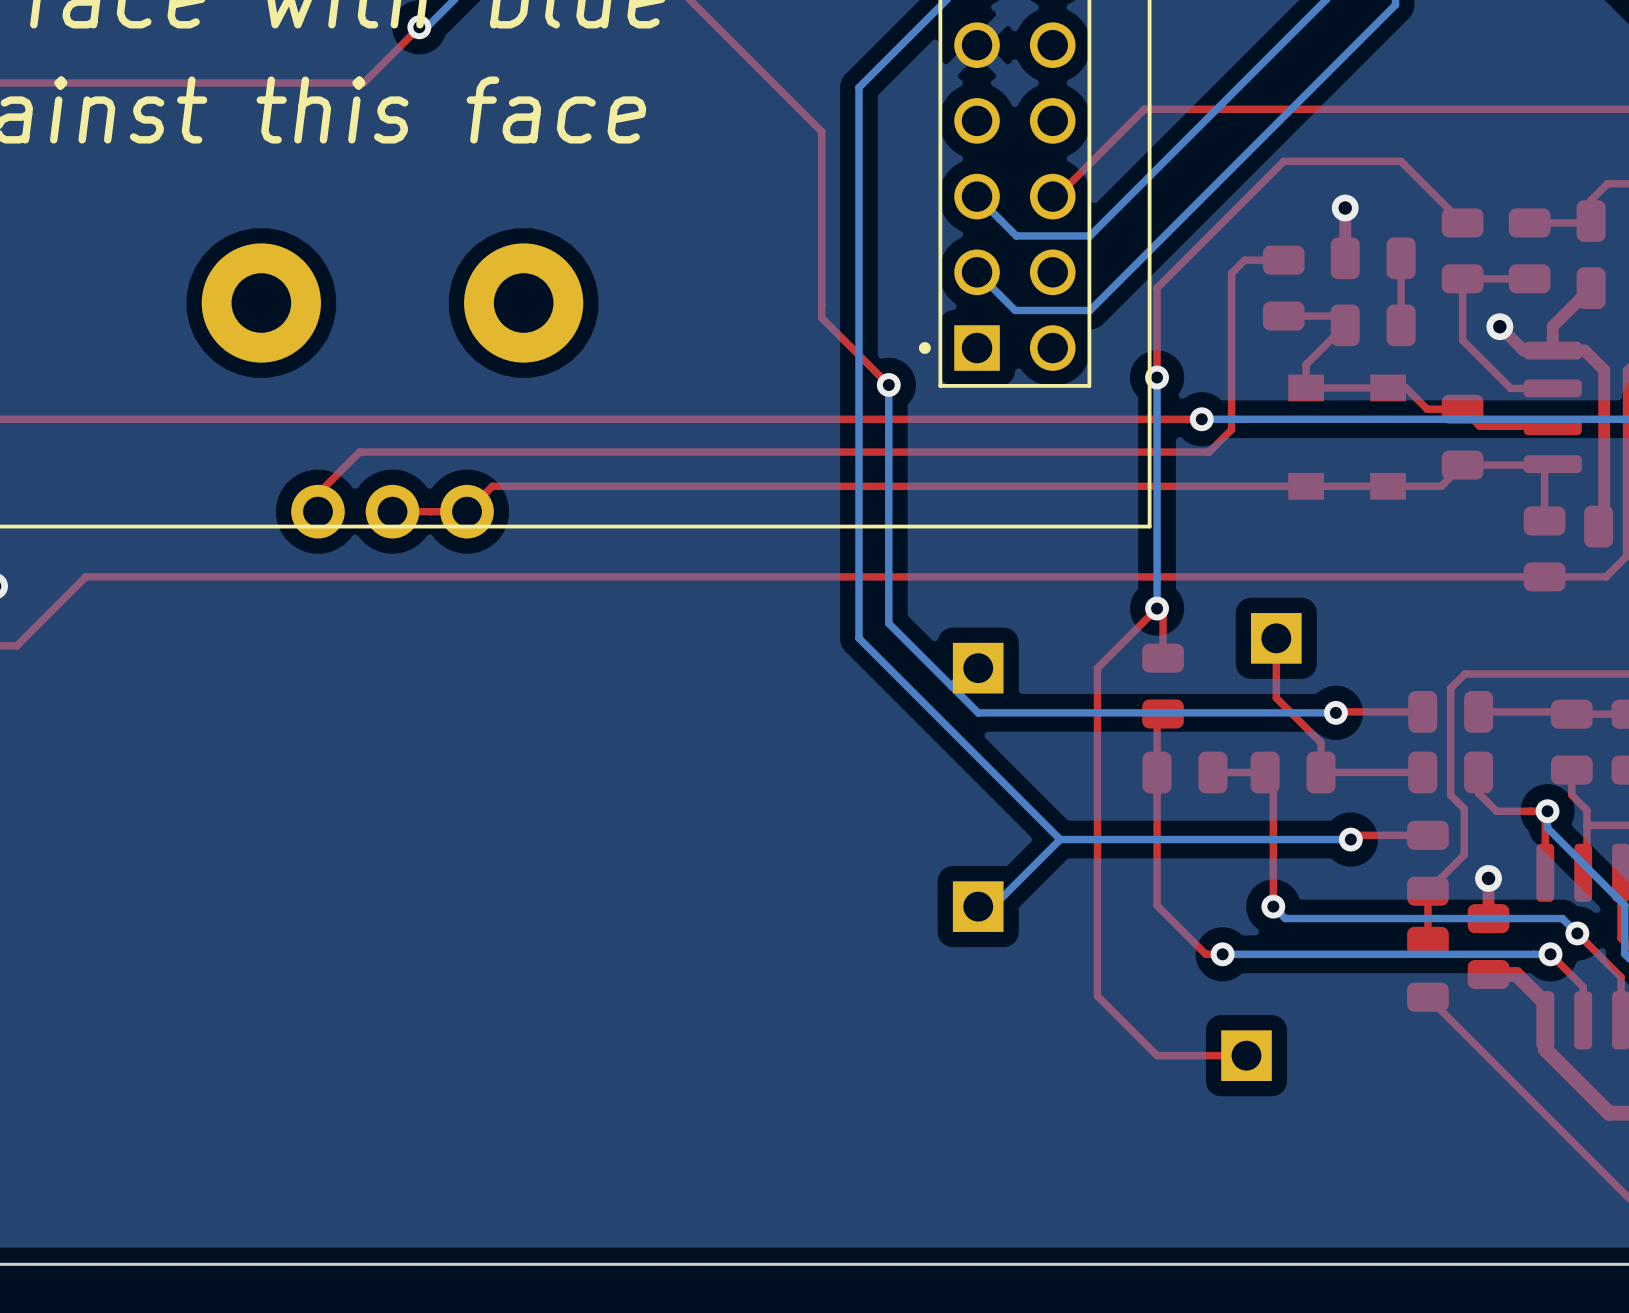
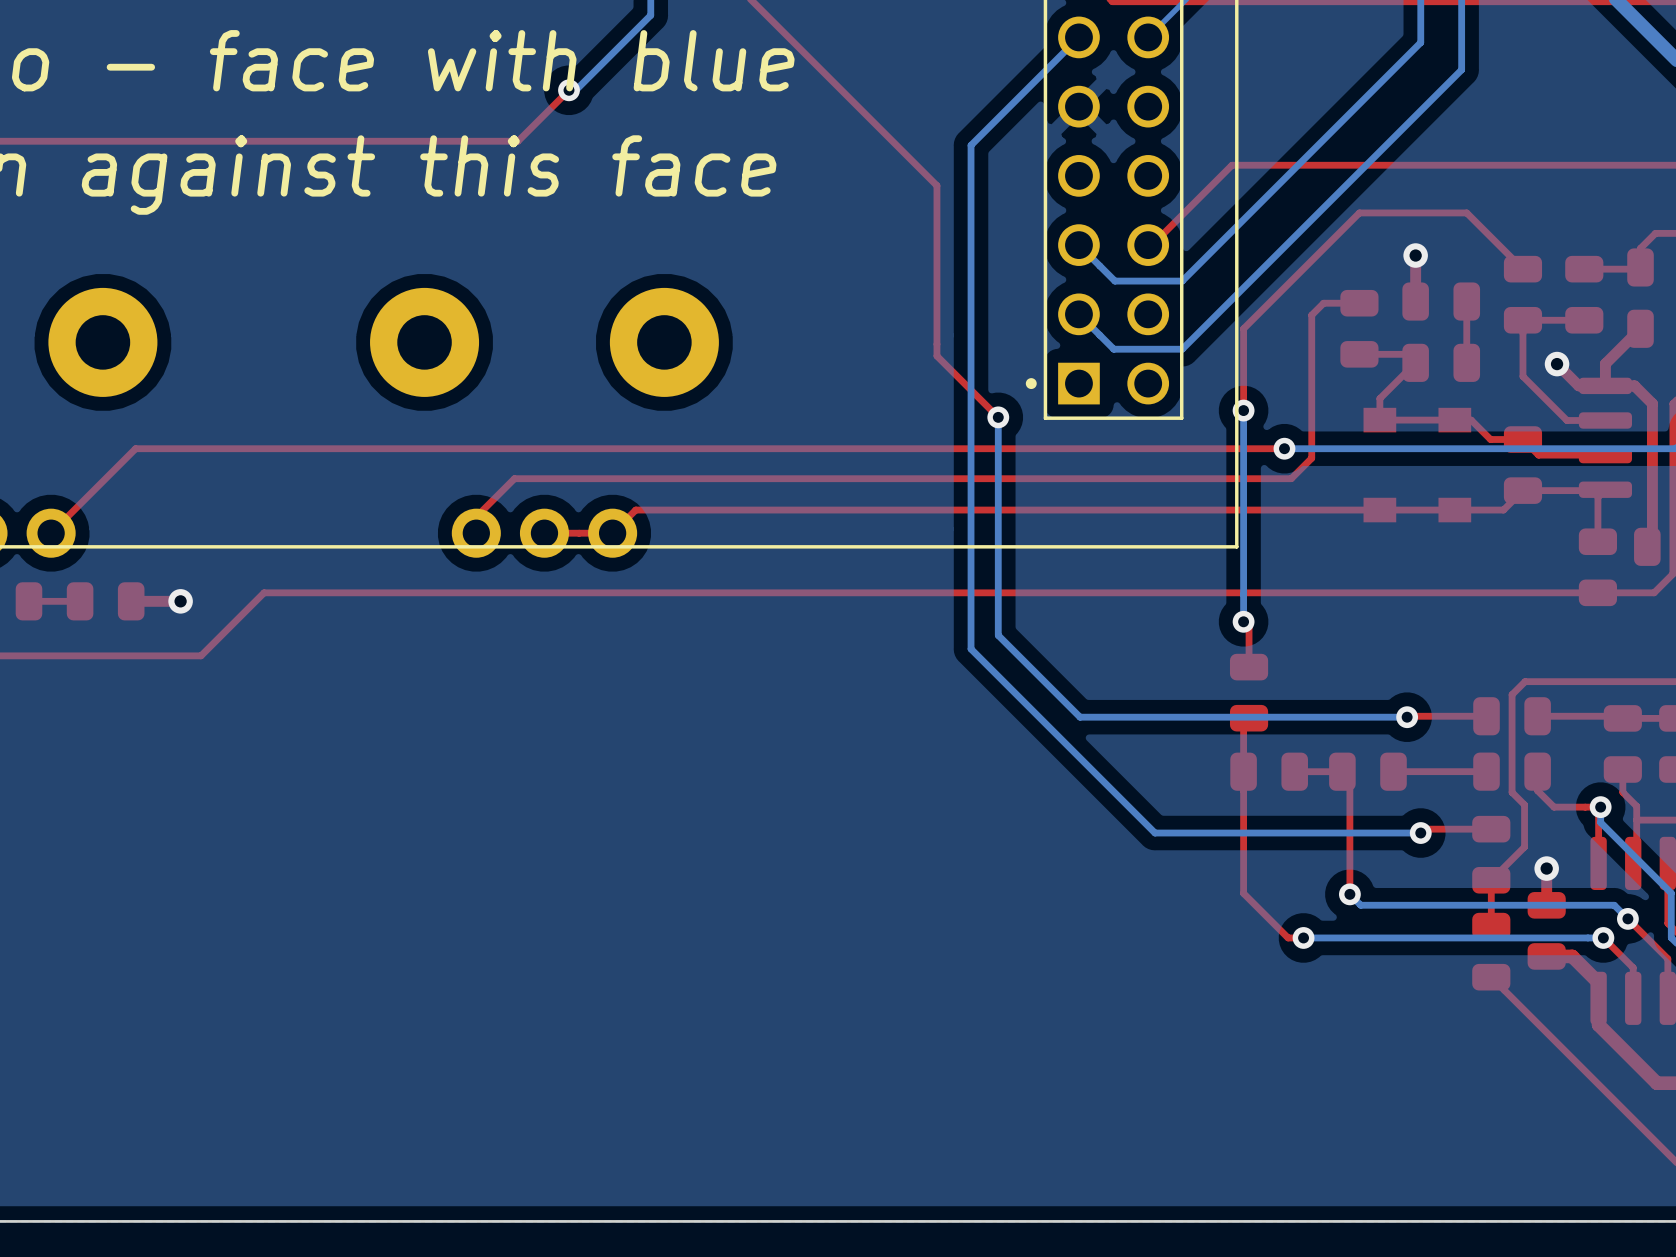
top track: (1157, 608) (1097, 668) (1097, 996) (1157, 1055) (1246, 1055) -> none
top track: (1276, 638) (1276, 697) (1321, 742) (1321, 772) -> none
part: (1276, 638) -> none
part: (978, 668) -> none
bottom track: (1060, 839) (993, 906) (978, 906) -> none
part: (978, 906) -> none
part: (1246, 1055) -> none

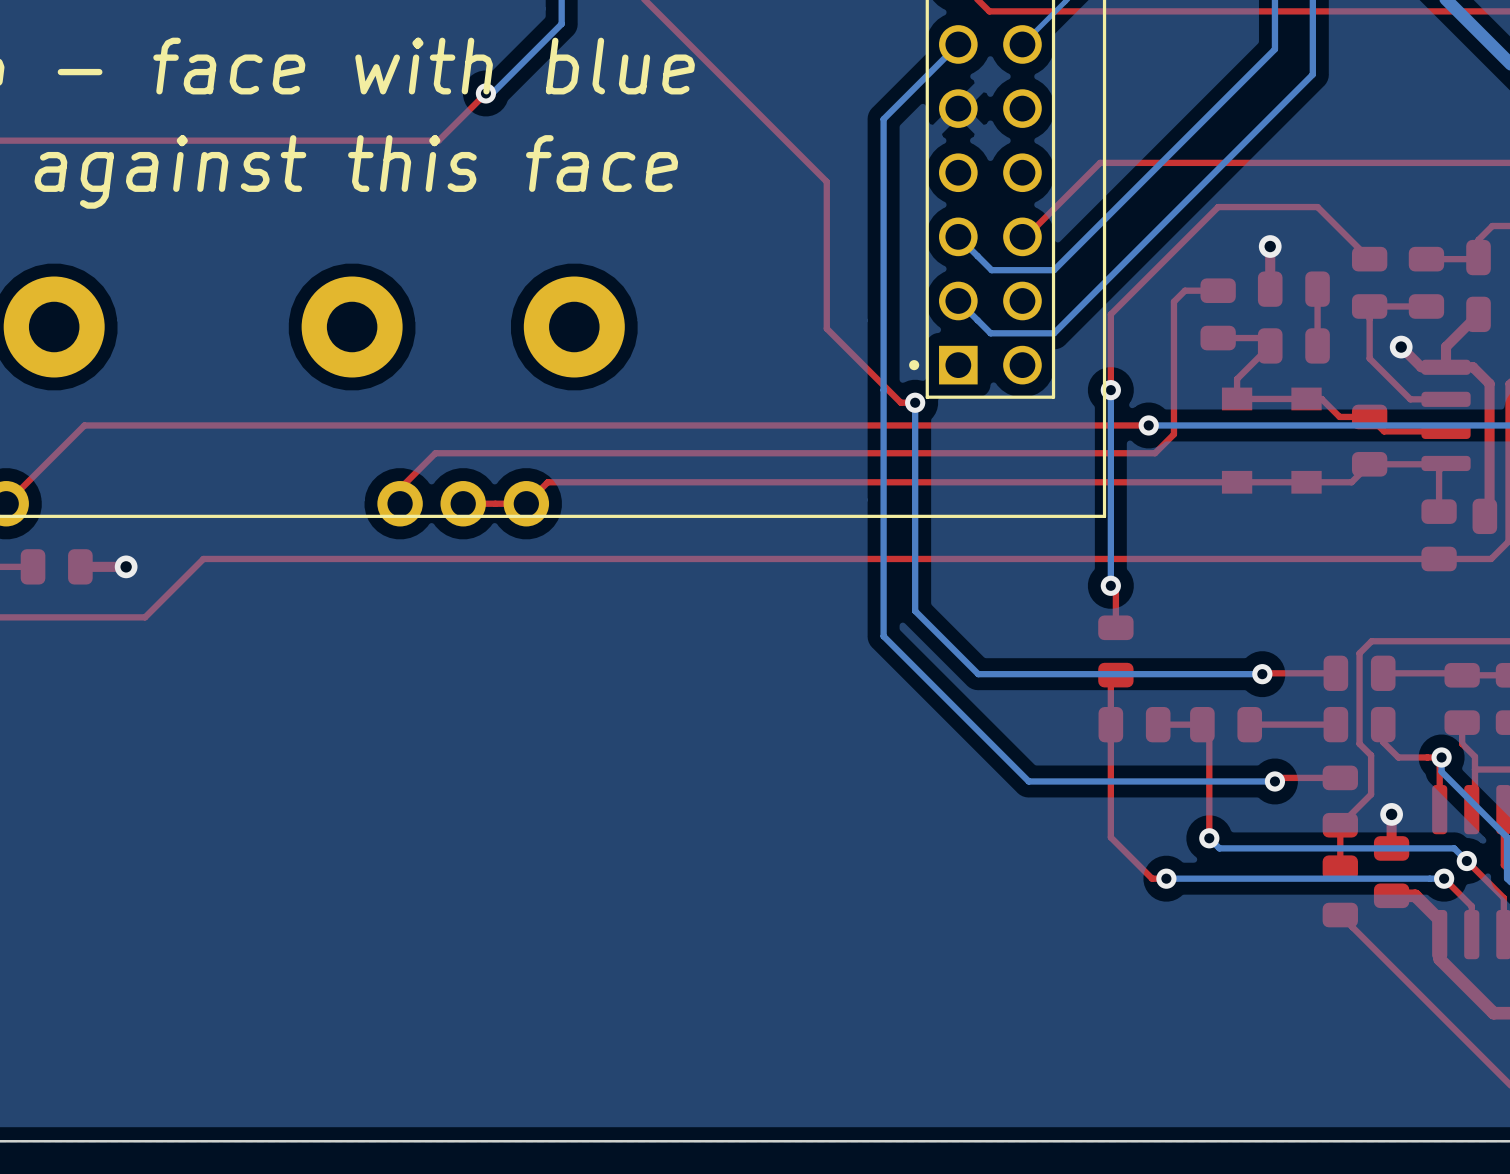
bottom track: (998, 118) (971, 145) (971, 649) (998, 676) -> (883, 119) (883, 396)
top track: (936, 344) (936, 356) (998, 417) -> (826, 328) (900, 402) (915, 402)
via position: (998, 417) -> (915, 402)
bottom track: none -> (915, 402) (915, 611) (978, 674)
bottom track: (998, 635) (1080, 717) (1100, 717) -> (883, 598) (883, 636)

